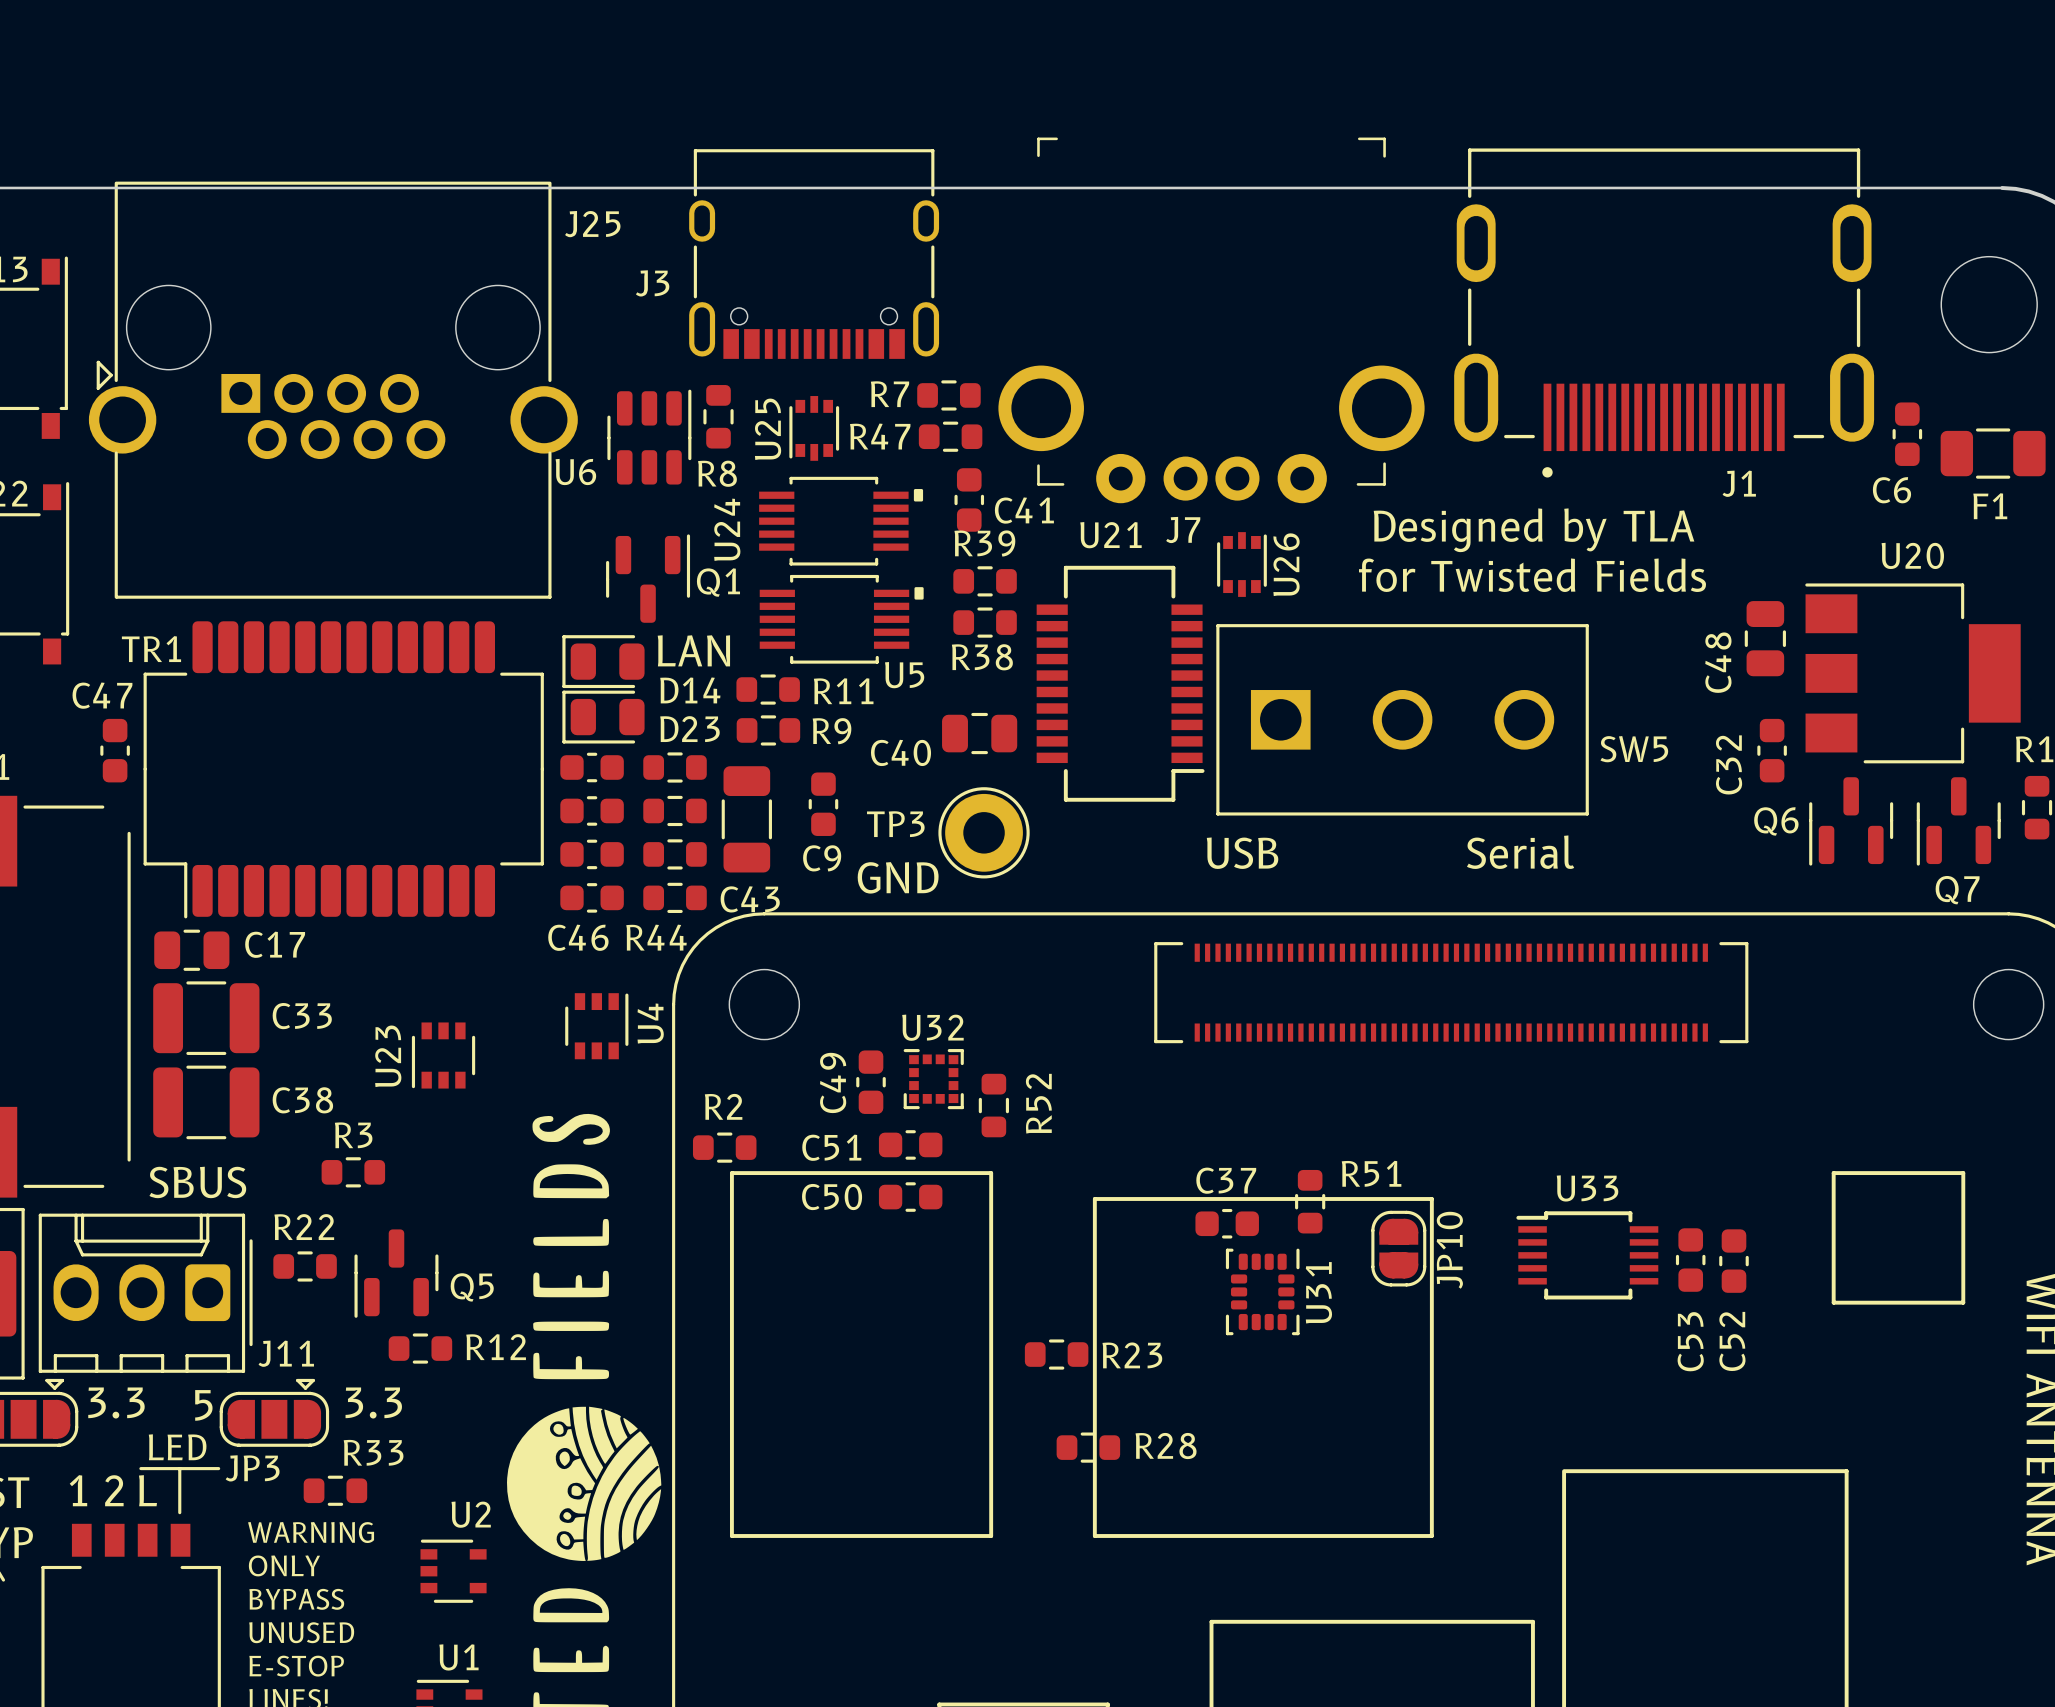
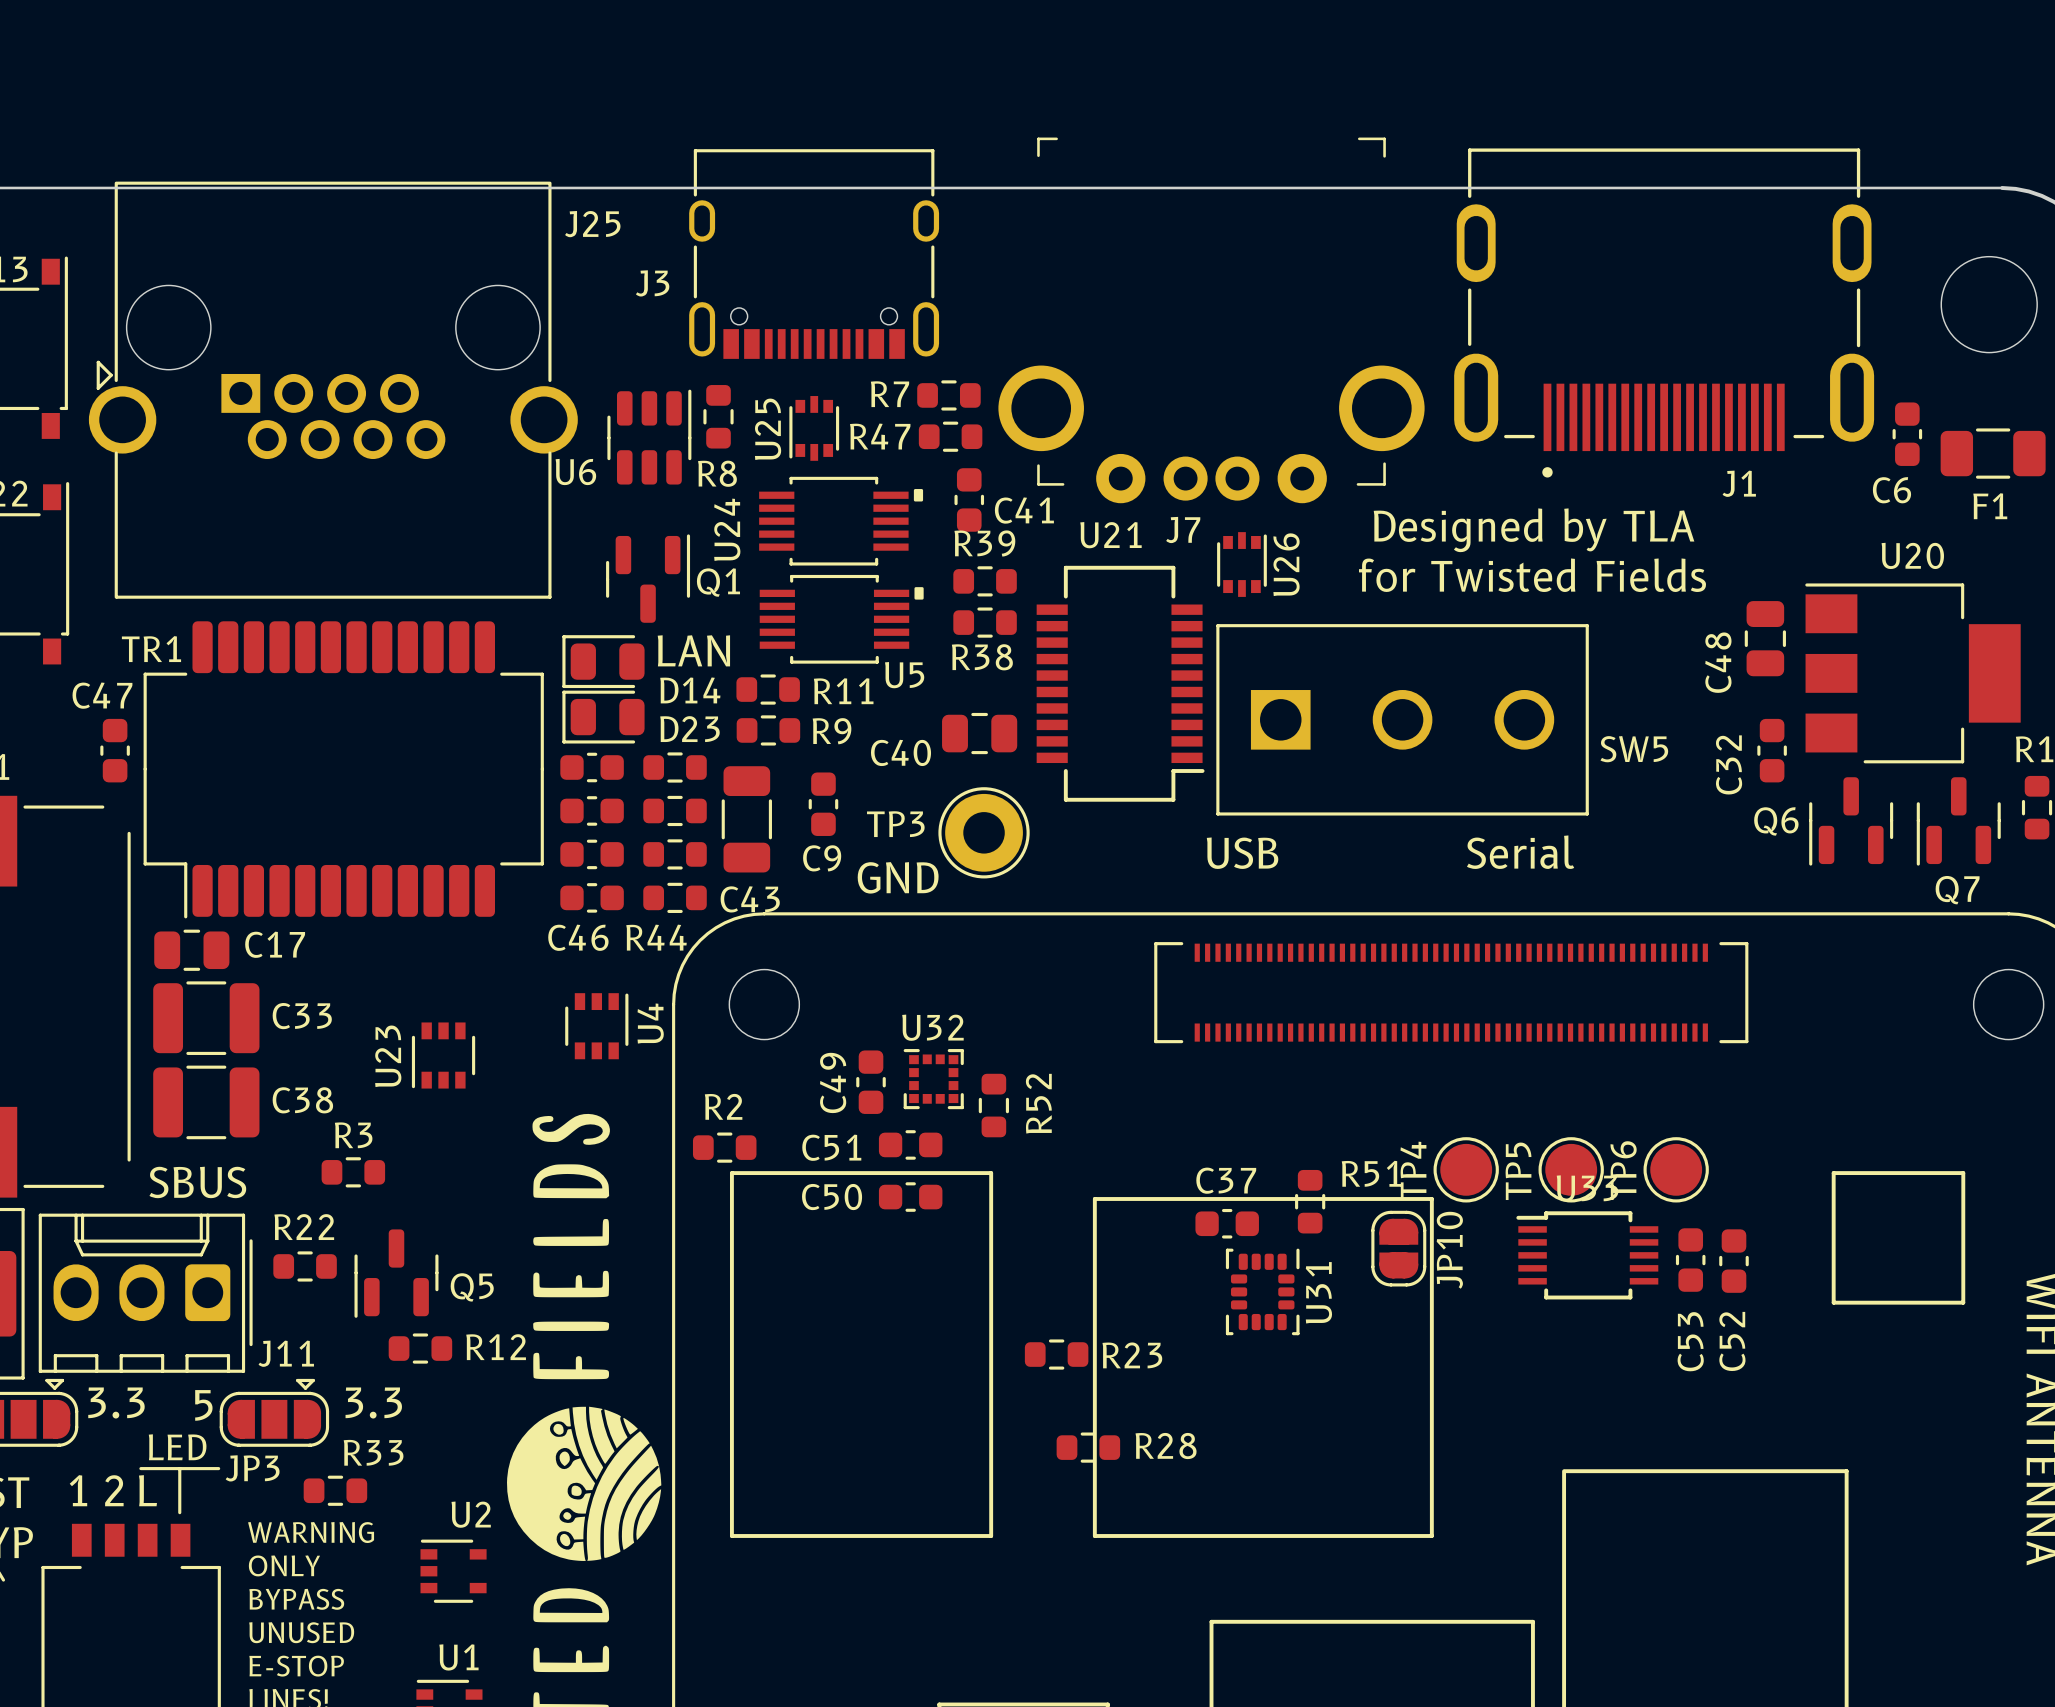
TP4: none -> (1466, 1169)
TP5: none -> (1571, 1169)
TP6: none -> (1676, 1169)

